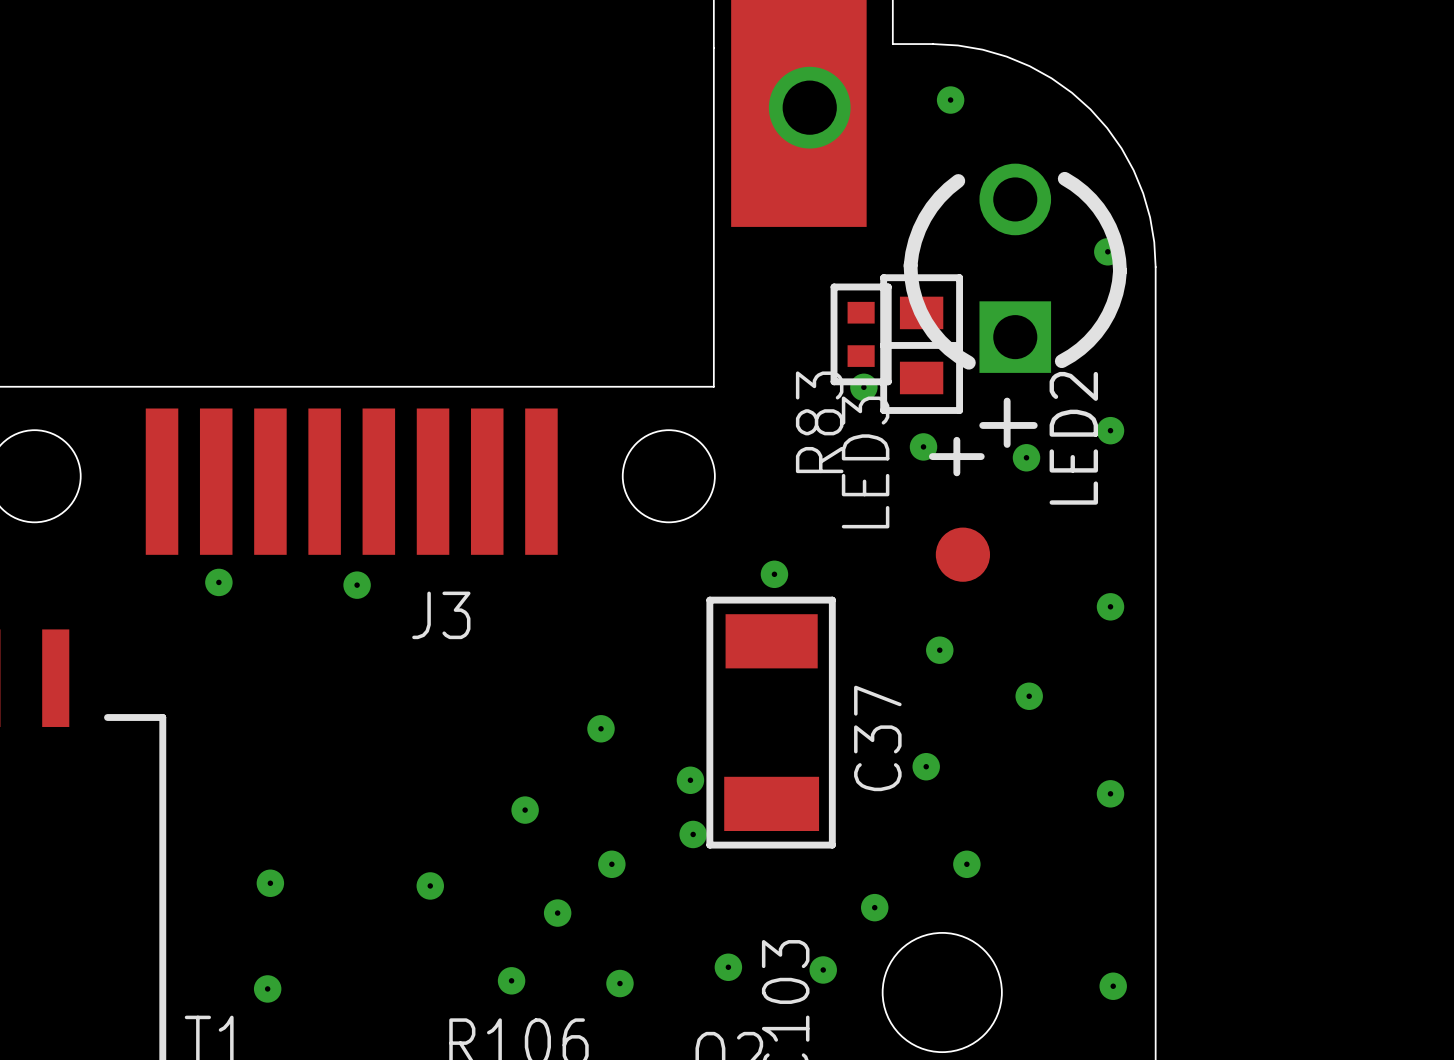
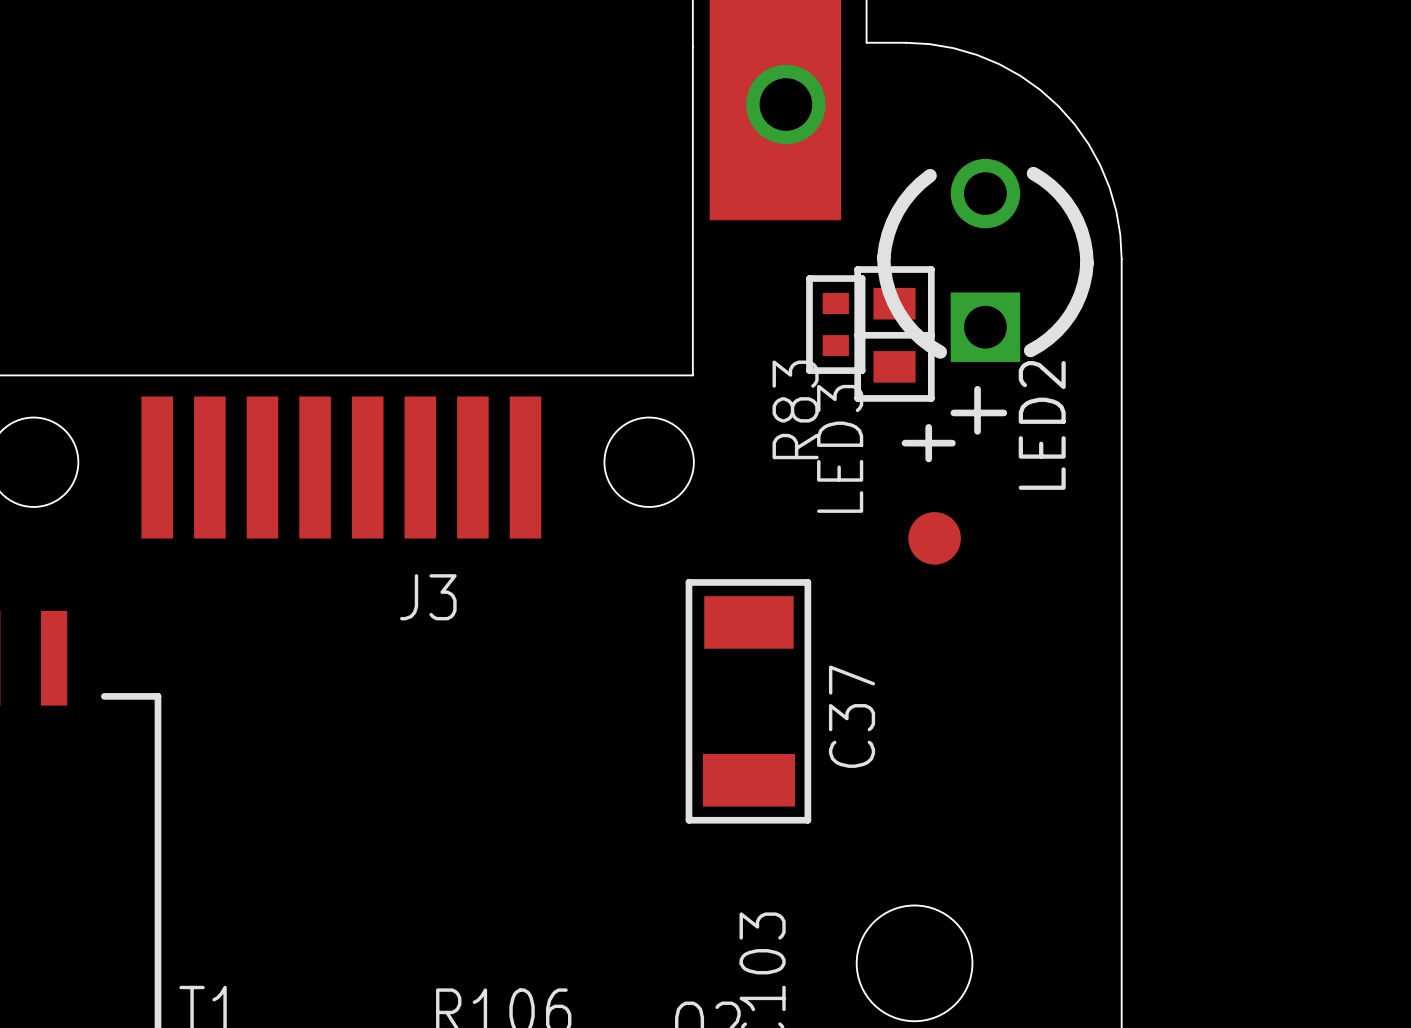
via: (950, 100) -> none
via: (1107, 251) -> none
via: (863, 387) -> none
via: (1110, 430) -> none
via: (923, 446) -> none
via: (1026, 457) -> none
via: (774, 574) -> none
via: (218, 582) -> none
via: (357, 585) -> none
via: (1110, 606) -> none
via: (939, 650) -> none
via: (1029, 696) -> none
via: (601, 728) -> none
via: (926, 766) -> none
via: (690, 780) -> none
via: (1110, 793) -> none
via: (525, 810) -> none
via: (693, 834) -> none
via: (611, 864) -> none
via: (966, 864) -> none
via: (270, 883) -> none
via: (430, 885) -> none
via: (874, 907) -> none
via: (557, 913) -> none
via: (728, 967) -> none
via: (823, 969) -> none
via: (511, 980) -> none
via: (619, 983) -> none
via: (1113, 986) -> none
via: (267, 988) -> none

